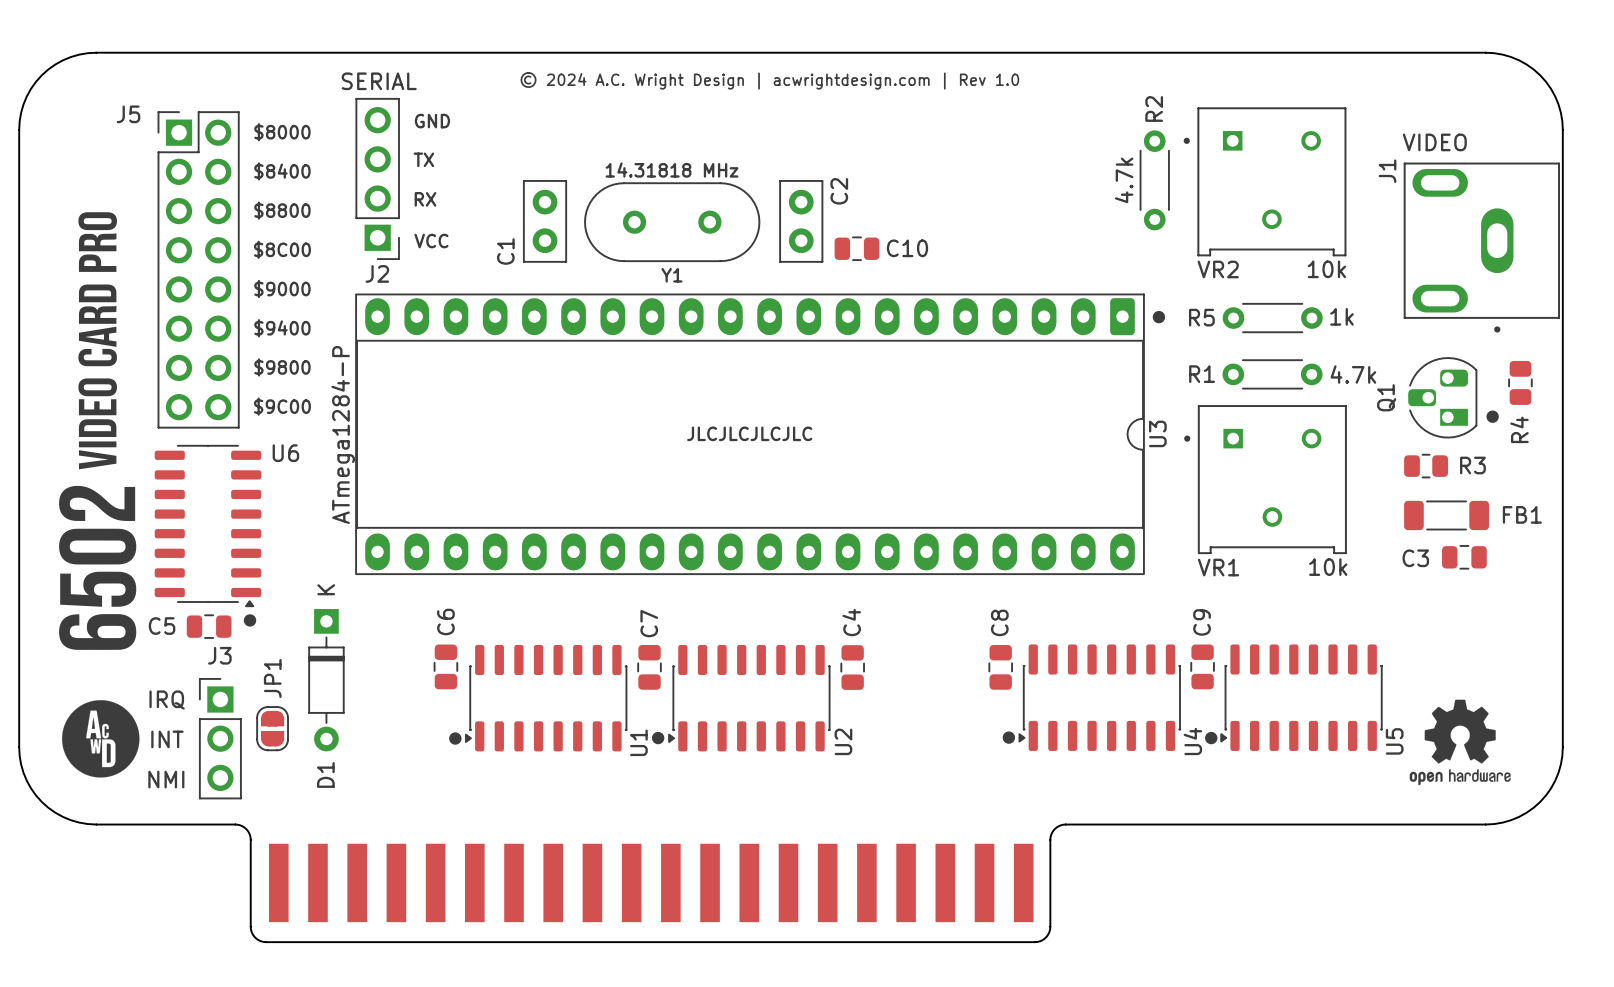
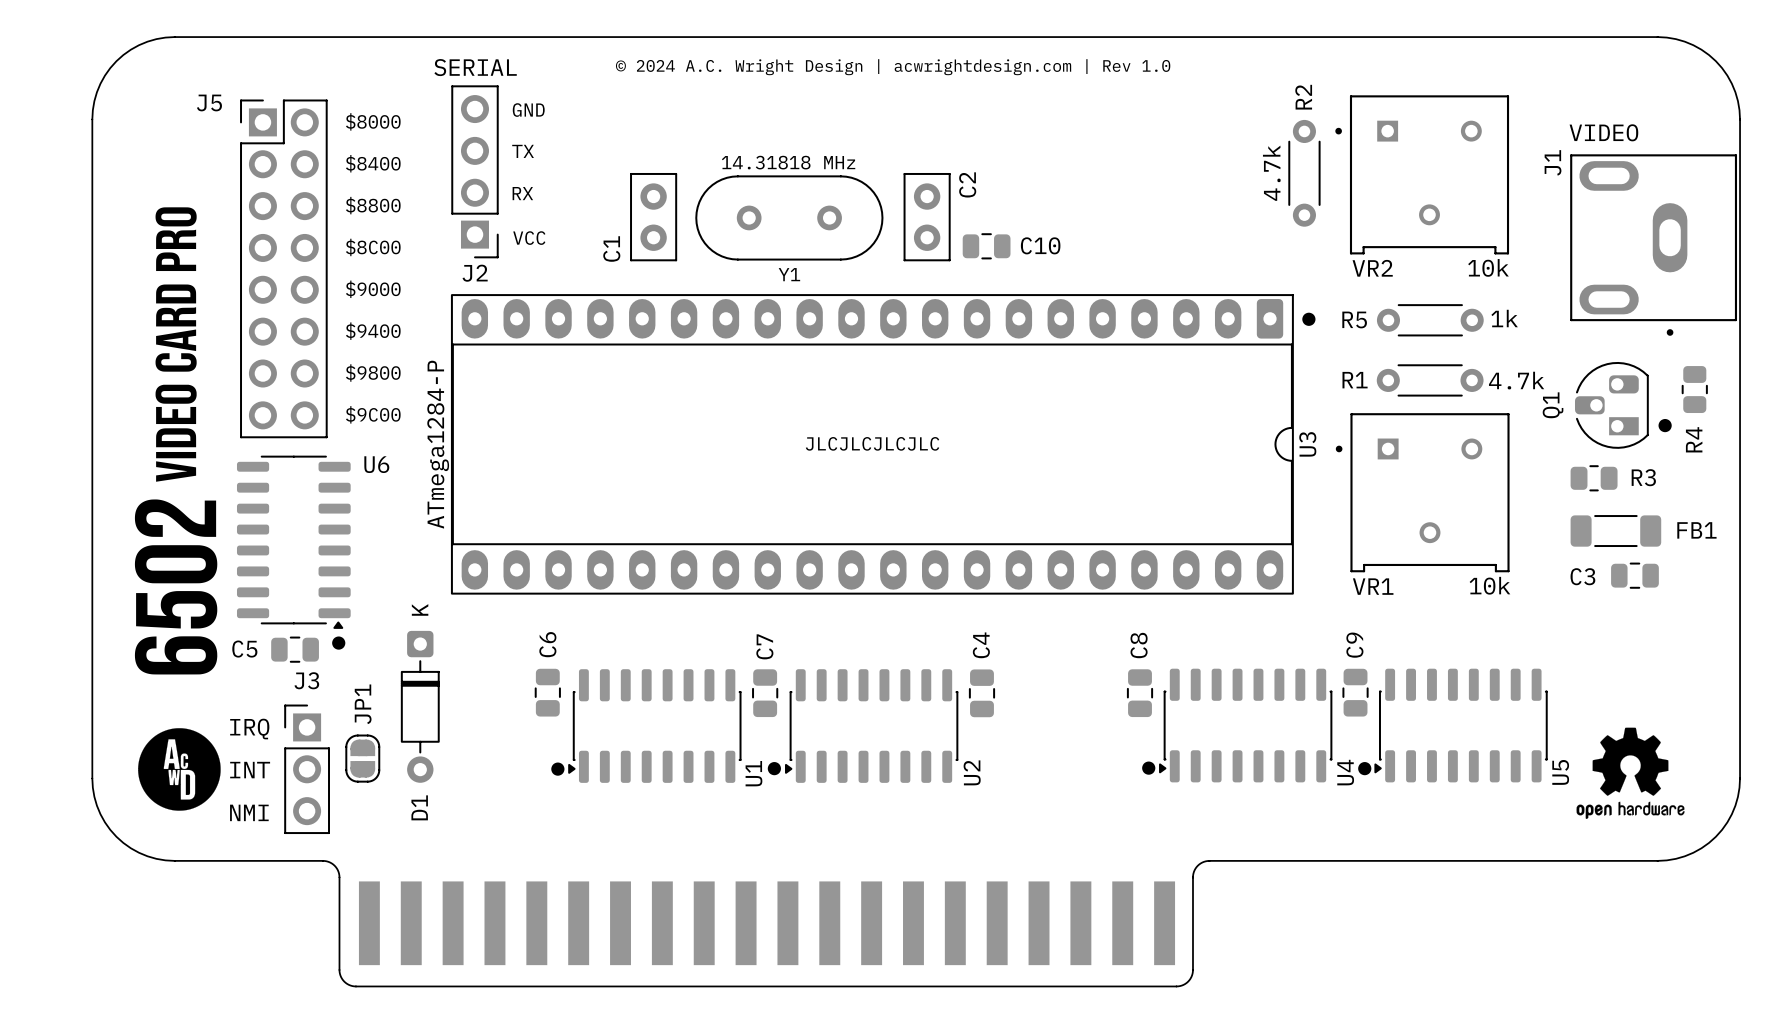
D1 footprint: [308, 609, 345, 752] -> [400, 630, 440, 783]

